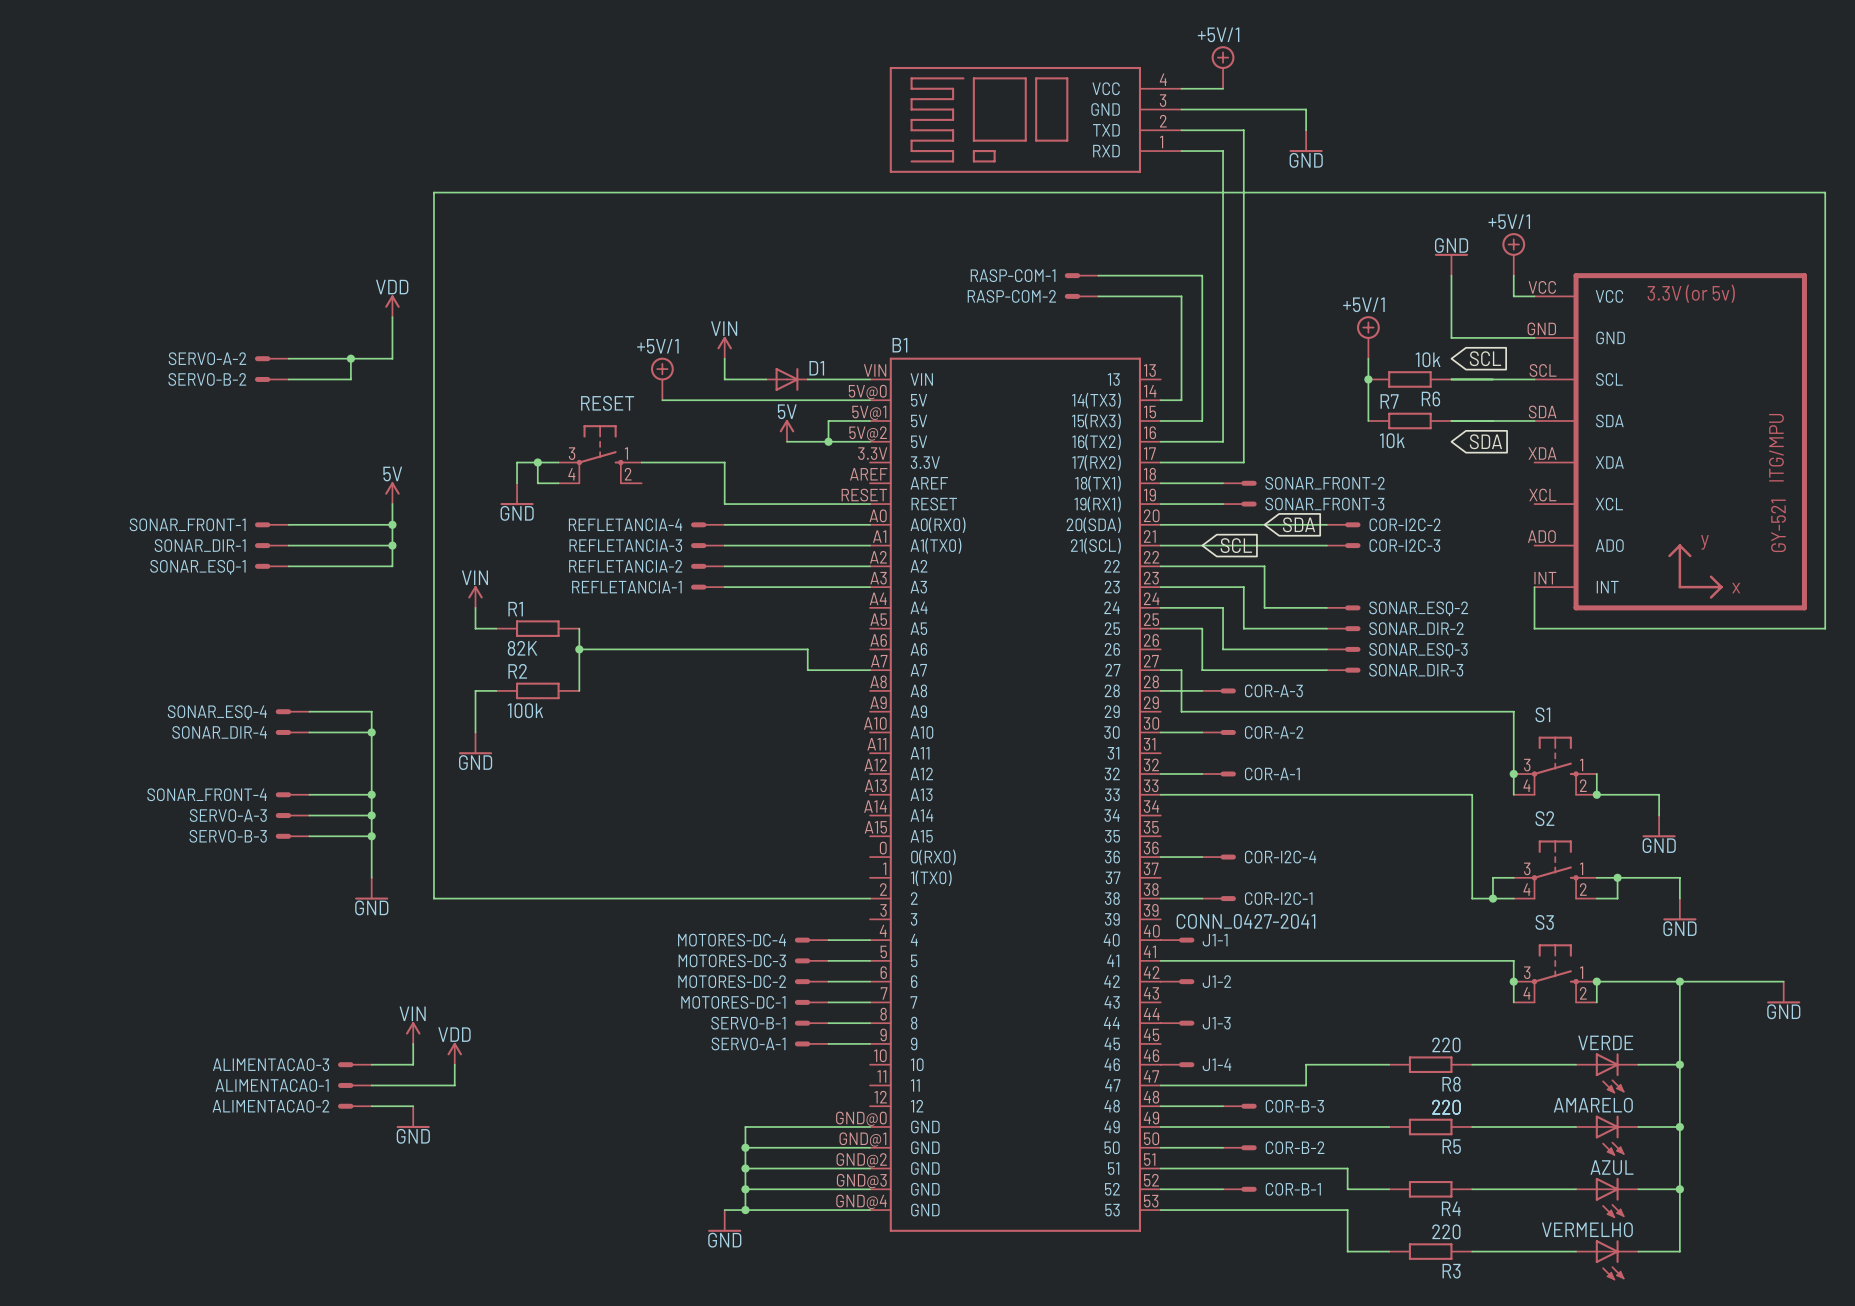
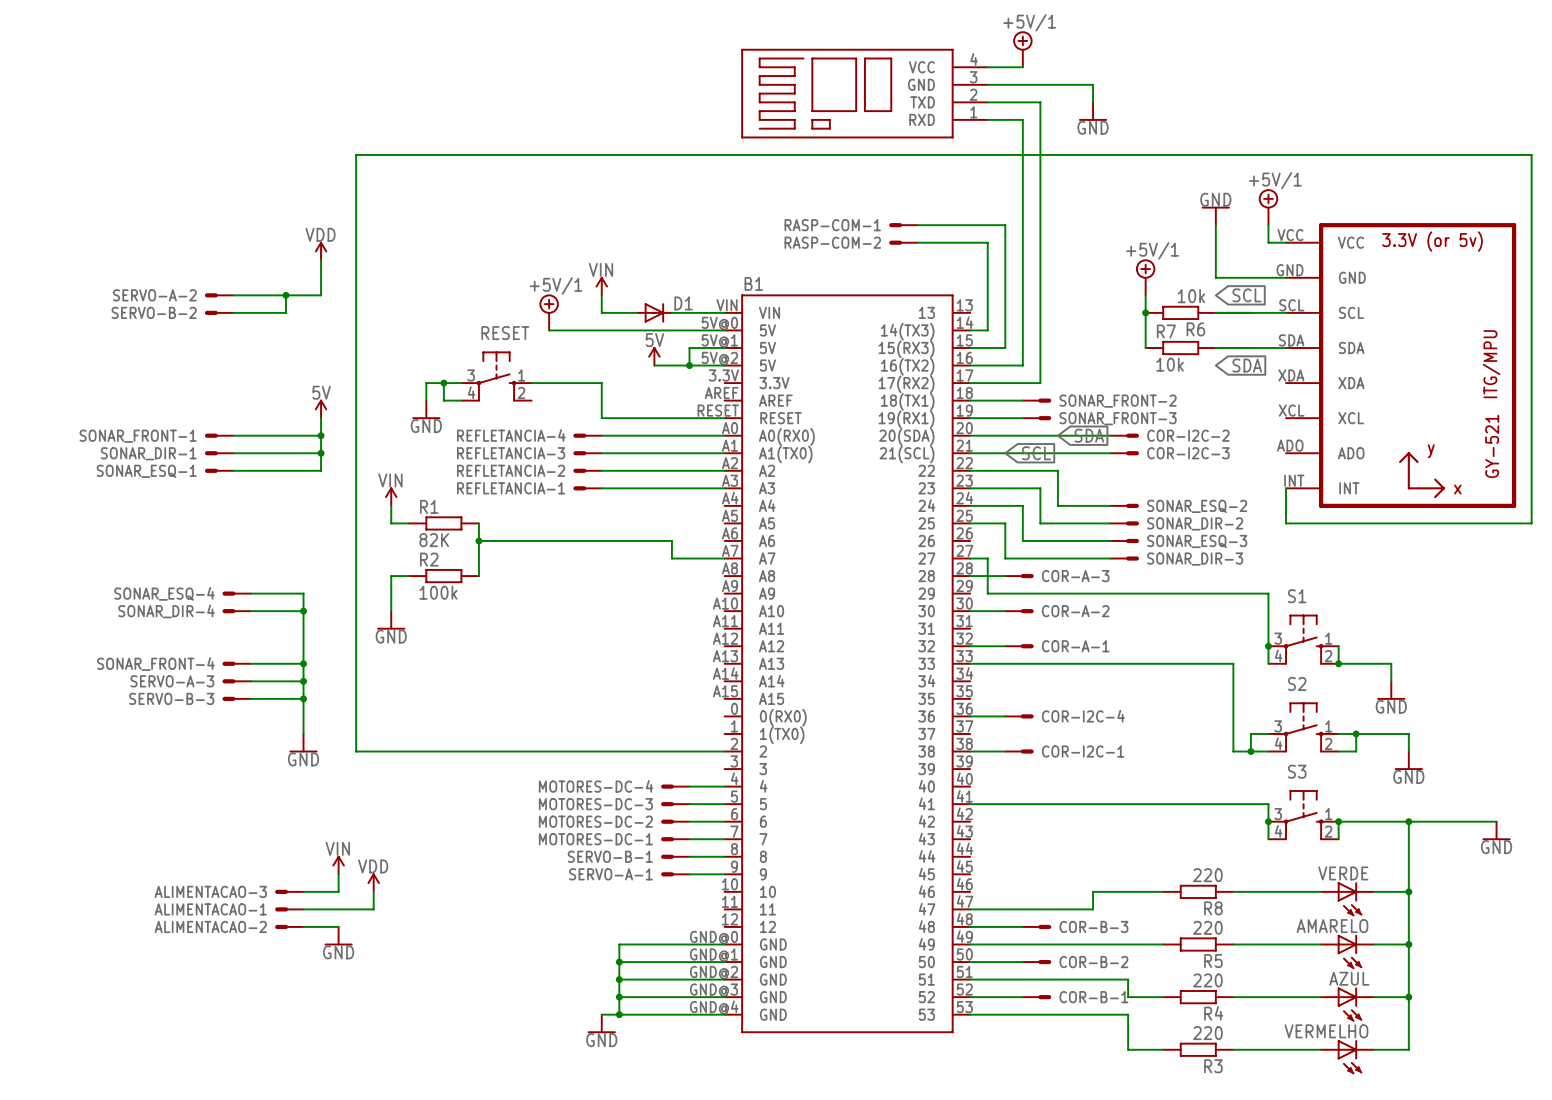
J1-1: CONN_0427-2041 (1177, 940) -> none
J1-2: (1177, 981) -> none
J1-3: (1177, 1023) -> none
J1-4: (1177, 1064) -> none
R4 value position: 220 (1446, 1107) -> 220 (1207, 980)

